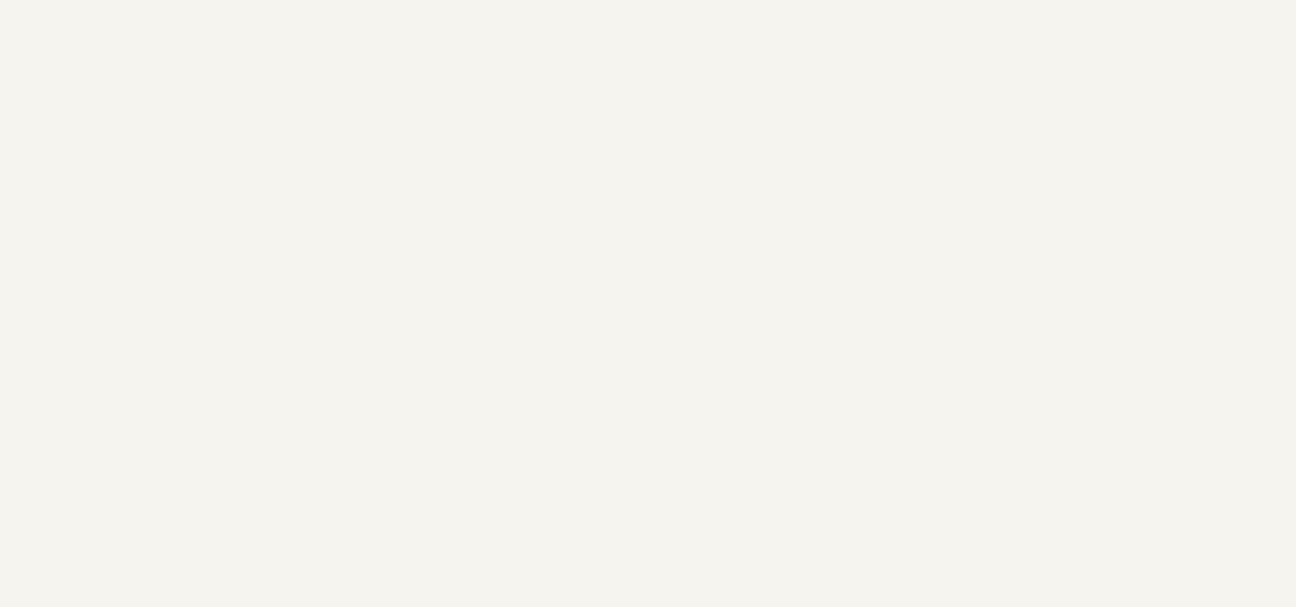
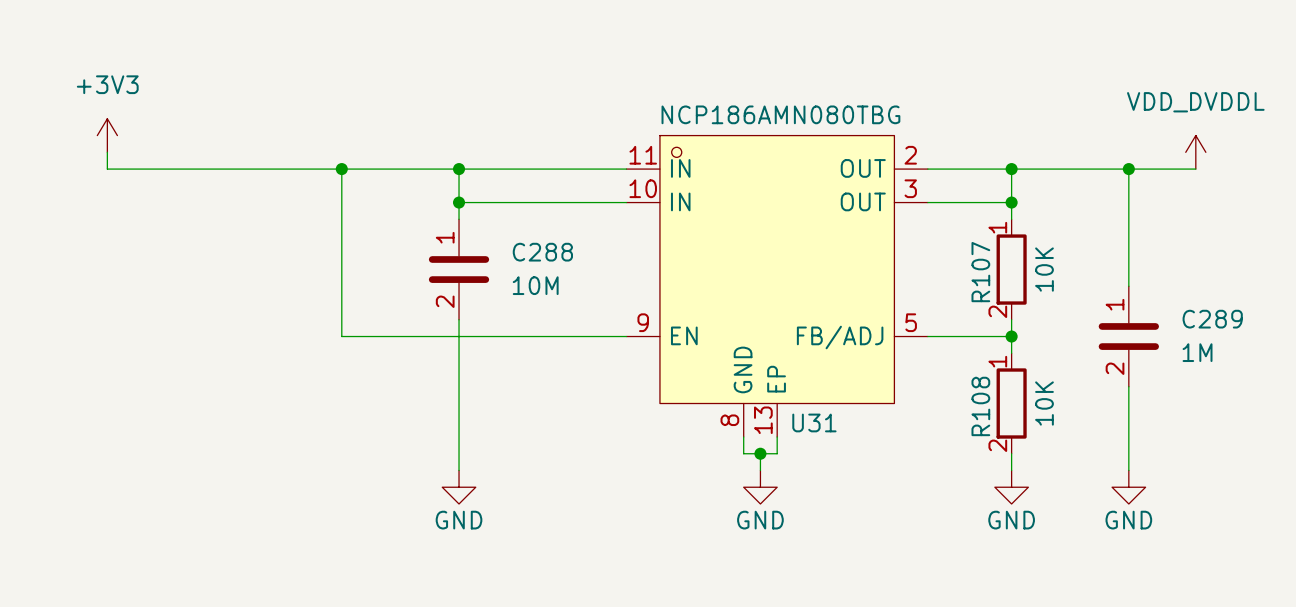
power symbol: none -> +3V3 (107, 135)
wire: none -> (107, 152) (107, 169) (626, 169)
power symbol: none -> VDD_DVDDL (1195, 152)
wire: none -> (341, 169) (341, 336) (626, 336)
junction: none -> (341, 169)
wire: none -> (459, 169) (459, 219)
junction: none -> (459, 169)
wire: none -> (927, 169) (1195, 169)
wire: none -> (1011, 169) (1011, 219)
junction: none -> (1011, 169)
wire: none -> (1128, 169) (1128, 286)
junction: none -> (1128, 169)
wire: none -> (459, 202) (626, 202)
junction: none -> (459, 202)
wire: none -> (927, 202) (1011, 202)
junction: none -> (1011, 202)
C288: none -> 10M (459, 269)
R107: none -> 10K (1011, 269)
U31: none -> NCP186AMN080TBG (777, 286)
wire: none -> (459, 319) (459, 470)
wire: none -> (1011, 319) (1011, 353)
wire: none -> (927, 336) (1011, 336)
junction: none -> (1011, 336)
C289: none -> 1M (1128, 336)
wire: none -> (1128, 386) (1128, 470)
R108: none -> 10K (1011, 403)
wire: none -> (743, 436) (743, 453) (777, 453) (777, 436)
wire: none -> (760, 453) (760, 470)
junction: none -> (760, 453)
wire: none -> (1011, 453) (1011, 470)
power symbol: none -> GND (459, 487)
power symbol: none -> GND (760, 487)
power symbol: none -> GND (1011, 487)
power symbol: none -> GND (1128, 487)

